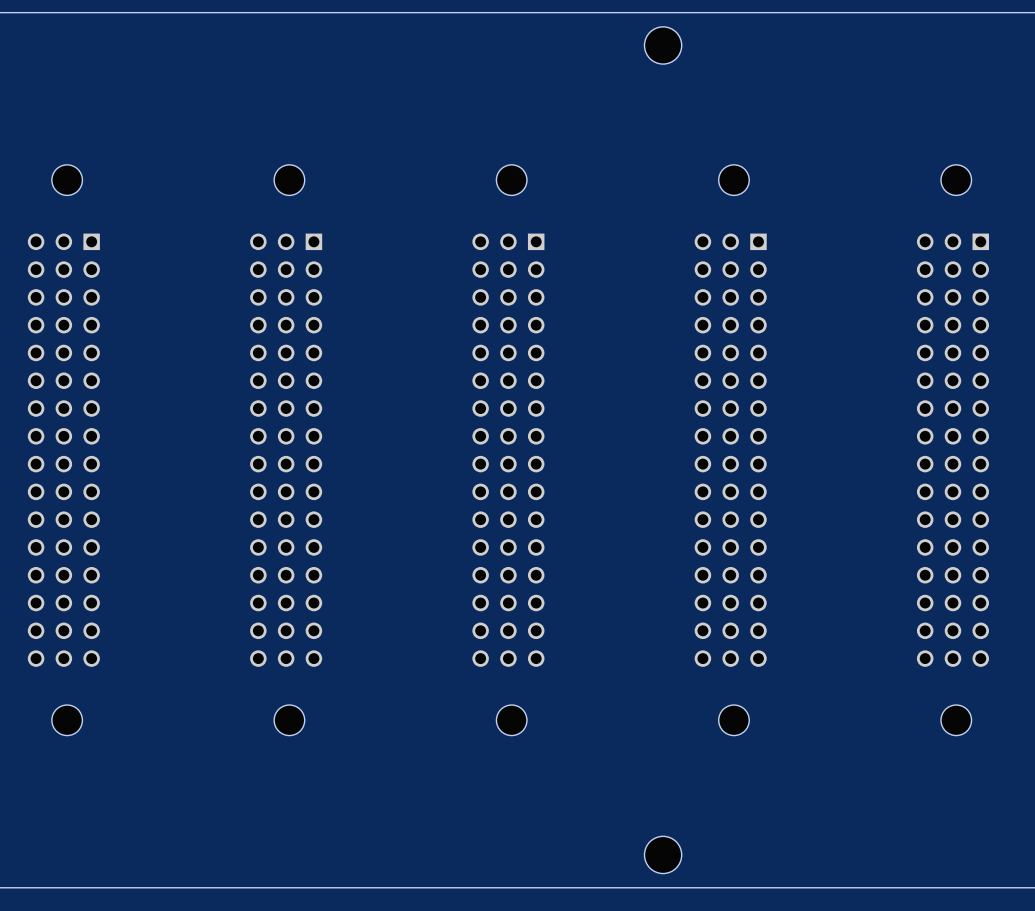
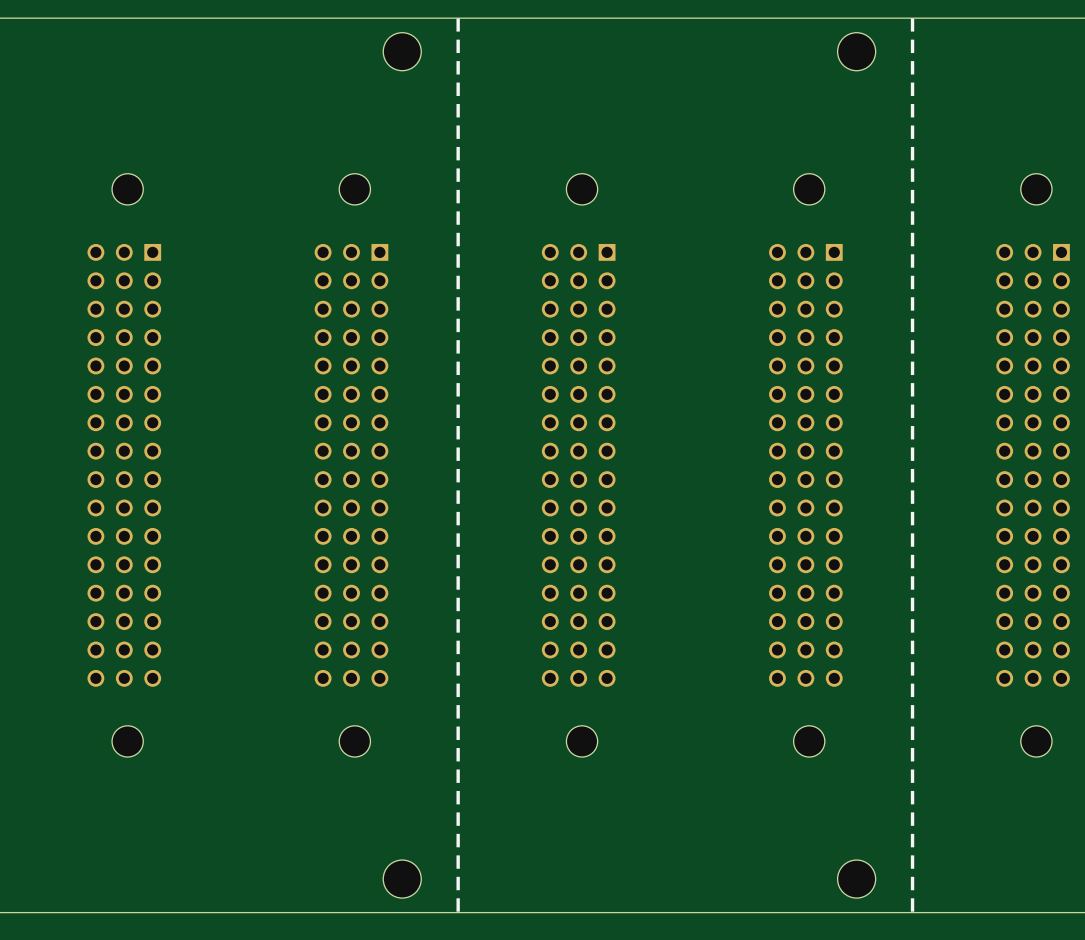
line: none -> (458, 18) (458, 912)
line: none -> (912, 18) (912, 912)
hole: none -> (402, 51)
hole position: (663, 45) -> (856, 51)
hole: none -> (402, 879)
hole position: (663, 854) -> (856, 879)

